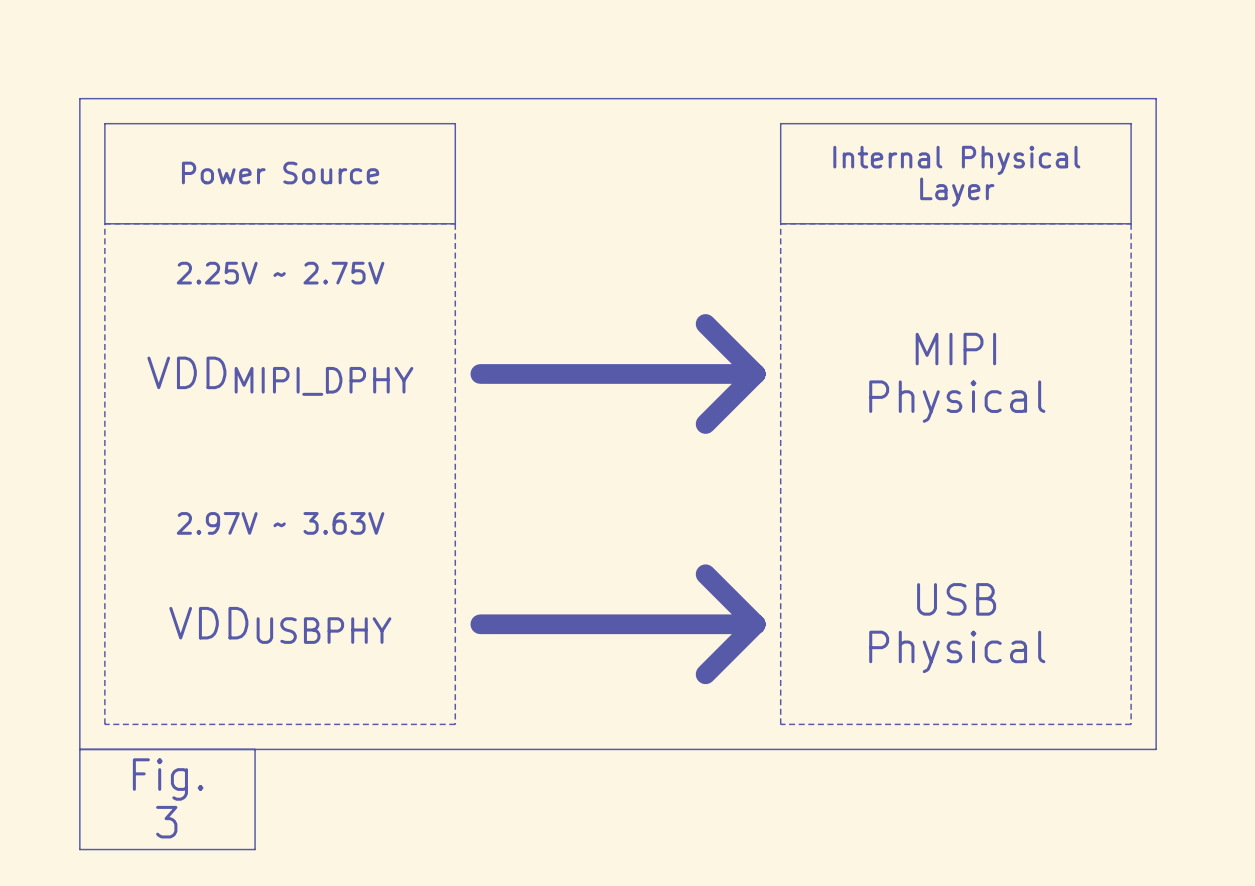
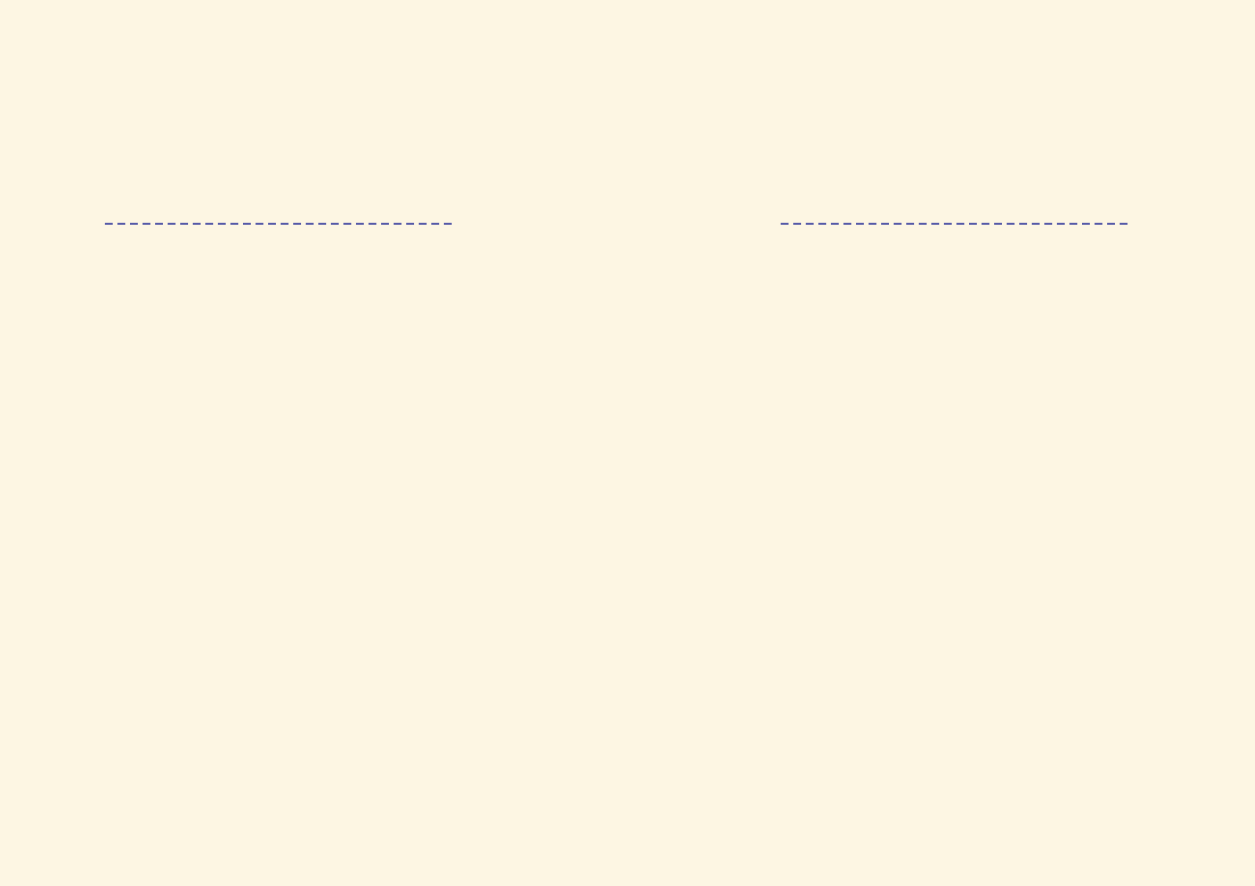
text: Internal Physical (956, 160) -> none
text: Power Source (280, 173) -> none
text: Layer (957, 192) -> none
line: (104, 223) (104, 123) (455, 123) (455, 223) -> none
line: (104, 223) (104, 724) (455, 724) (455, 223) -> none
line: (780, 223) (780, 123) (1131, 123) (1131, 223) -> none
line: (780, 223) (780, 724) (1131, 724) (1131, 223) -> none
text: 2.25V ~ 2.75V (280, 273) -> none
line: (705, 323) (755, 373) -> none
text: MIPI (955, 349) -> none
line: (480, 373) (755, 373) -> none
line: (755, 373) (705, 424) -> none
text: VDDMIPI_DPHY (280, 376) -> none
text: Physical (957, 401) -> none
text: 2.97V ~ 3.63V (280, 523) -> none
line: (705, 574) (755, 624) -> none
text: USB (956, 599) -> none
line: (480, 624) (755, 624) -> none
line: (755, 624) (705, 674) -> none
text: VDDUSBPHY (280, 625) -> none
text: Physical (957, 651) -> none
line: (79, 749) (1156, 749) (1156, 98) (79, 98) (79, 849) (255, 849) (255, 749) -> none
text: Fig. (168, 779) -> none
text: 3 (166, 822) -> none

